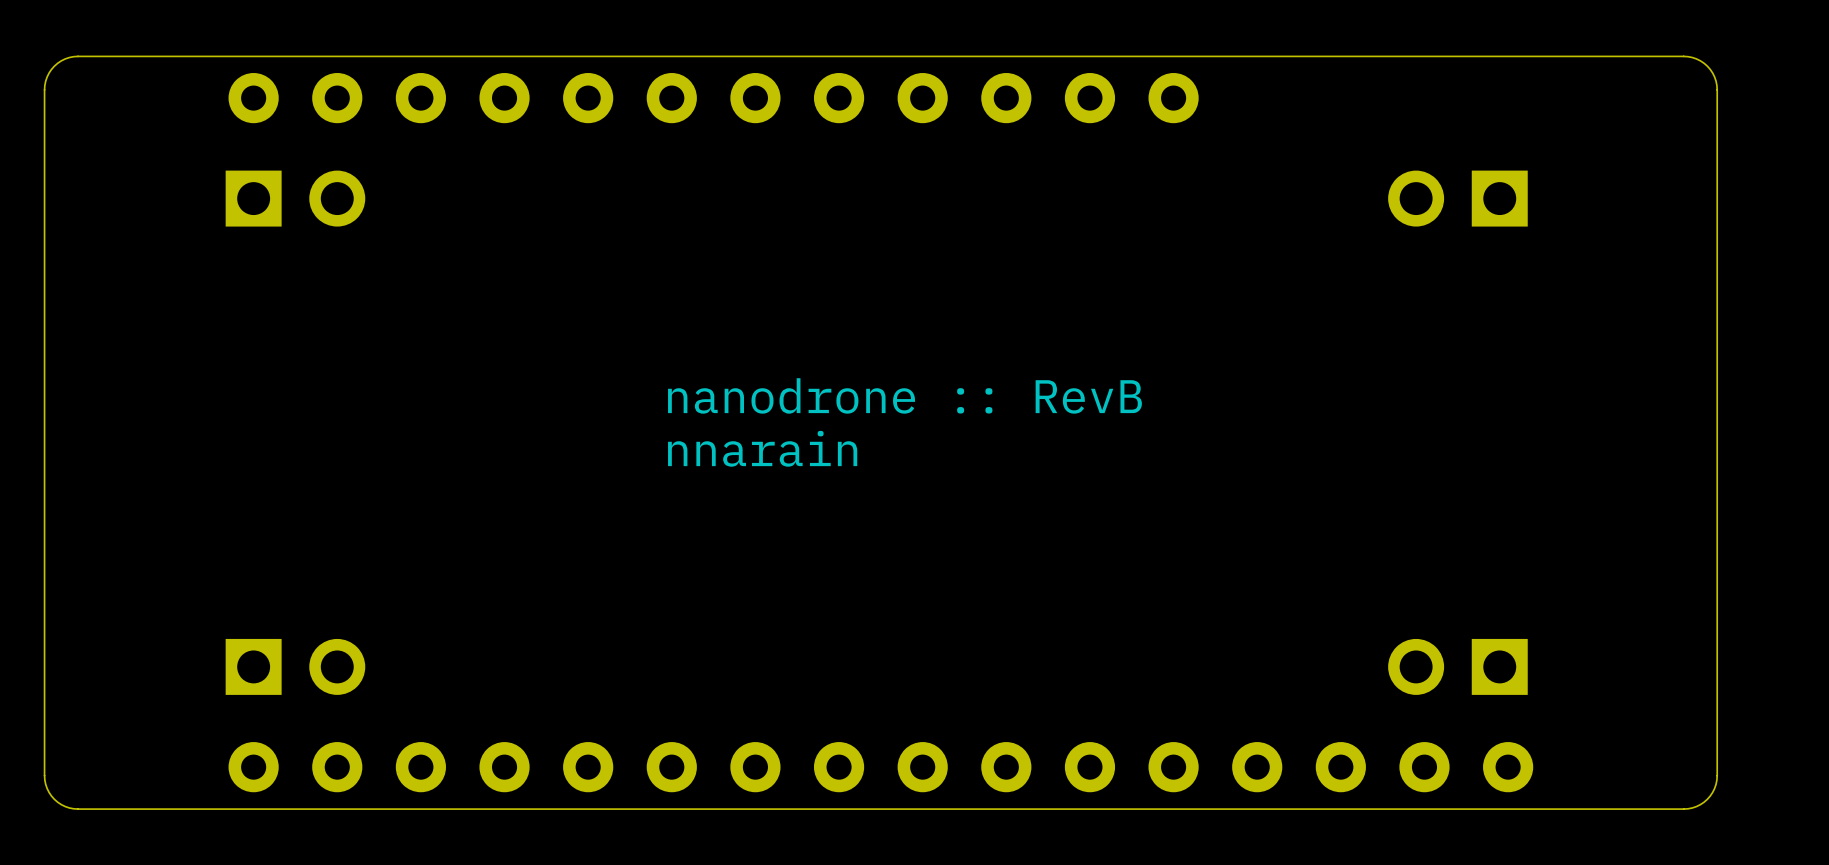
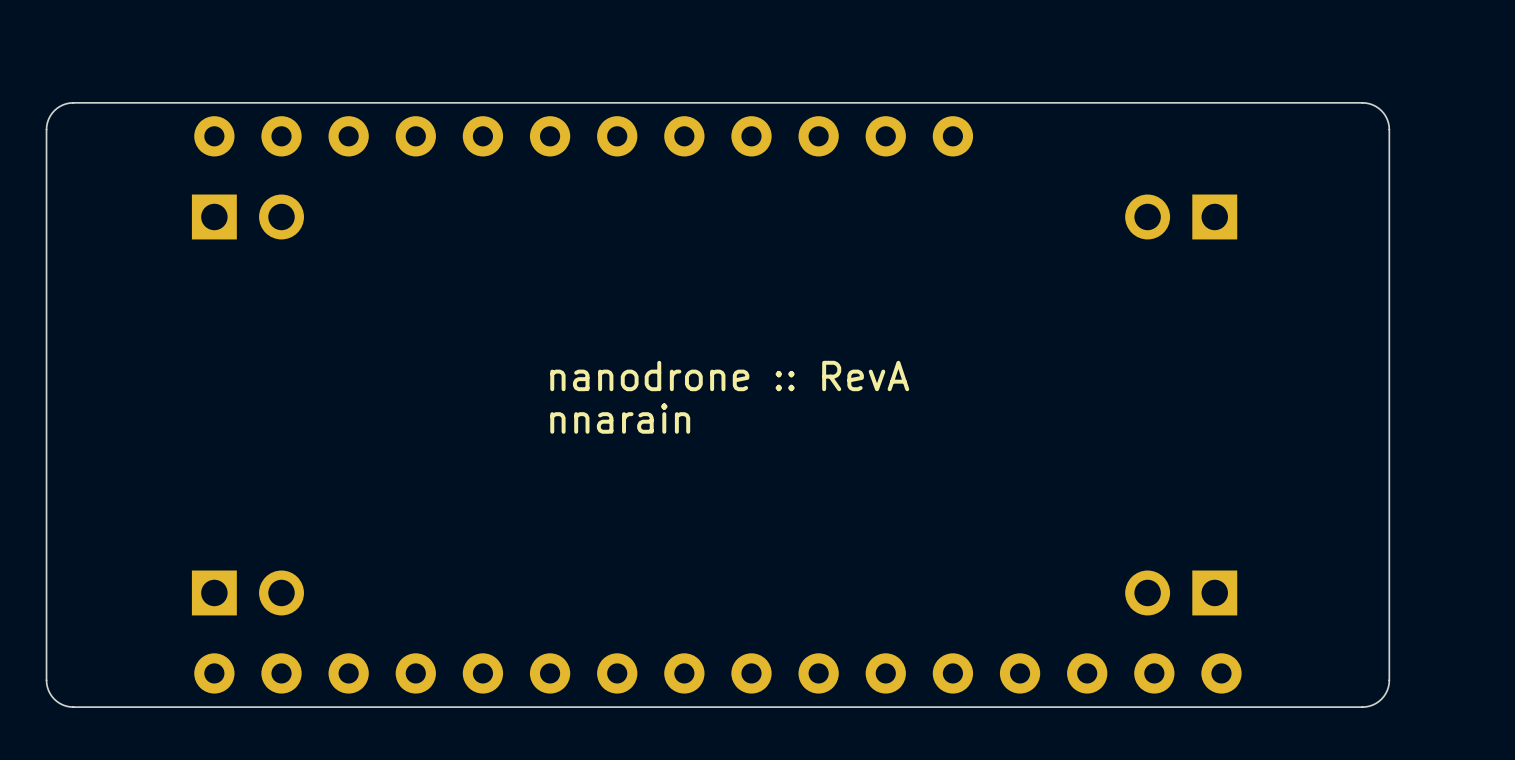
text: nanodrone :: RevB (904, 395) -> nanodrone :: RevA (729, 376)

